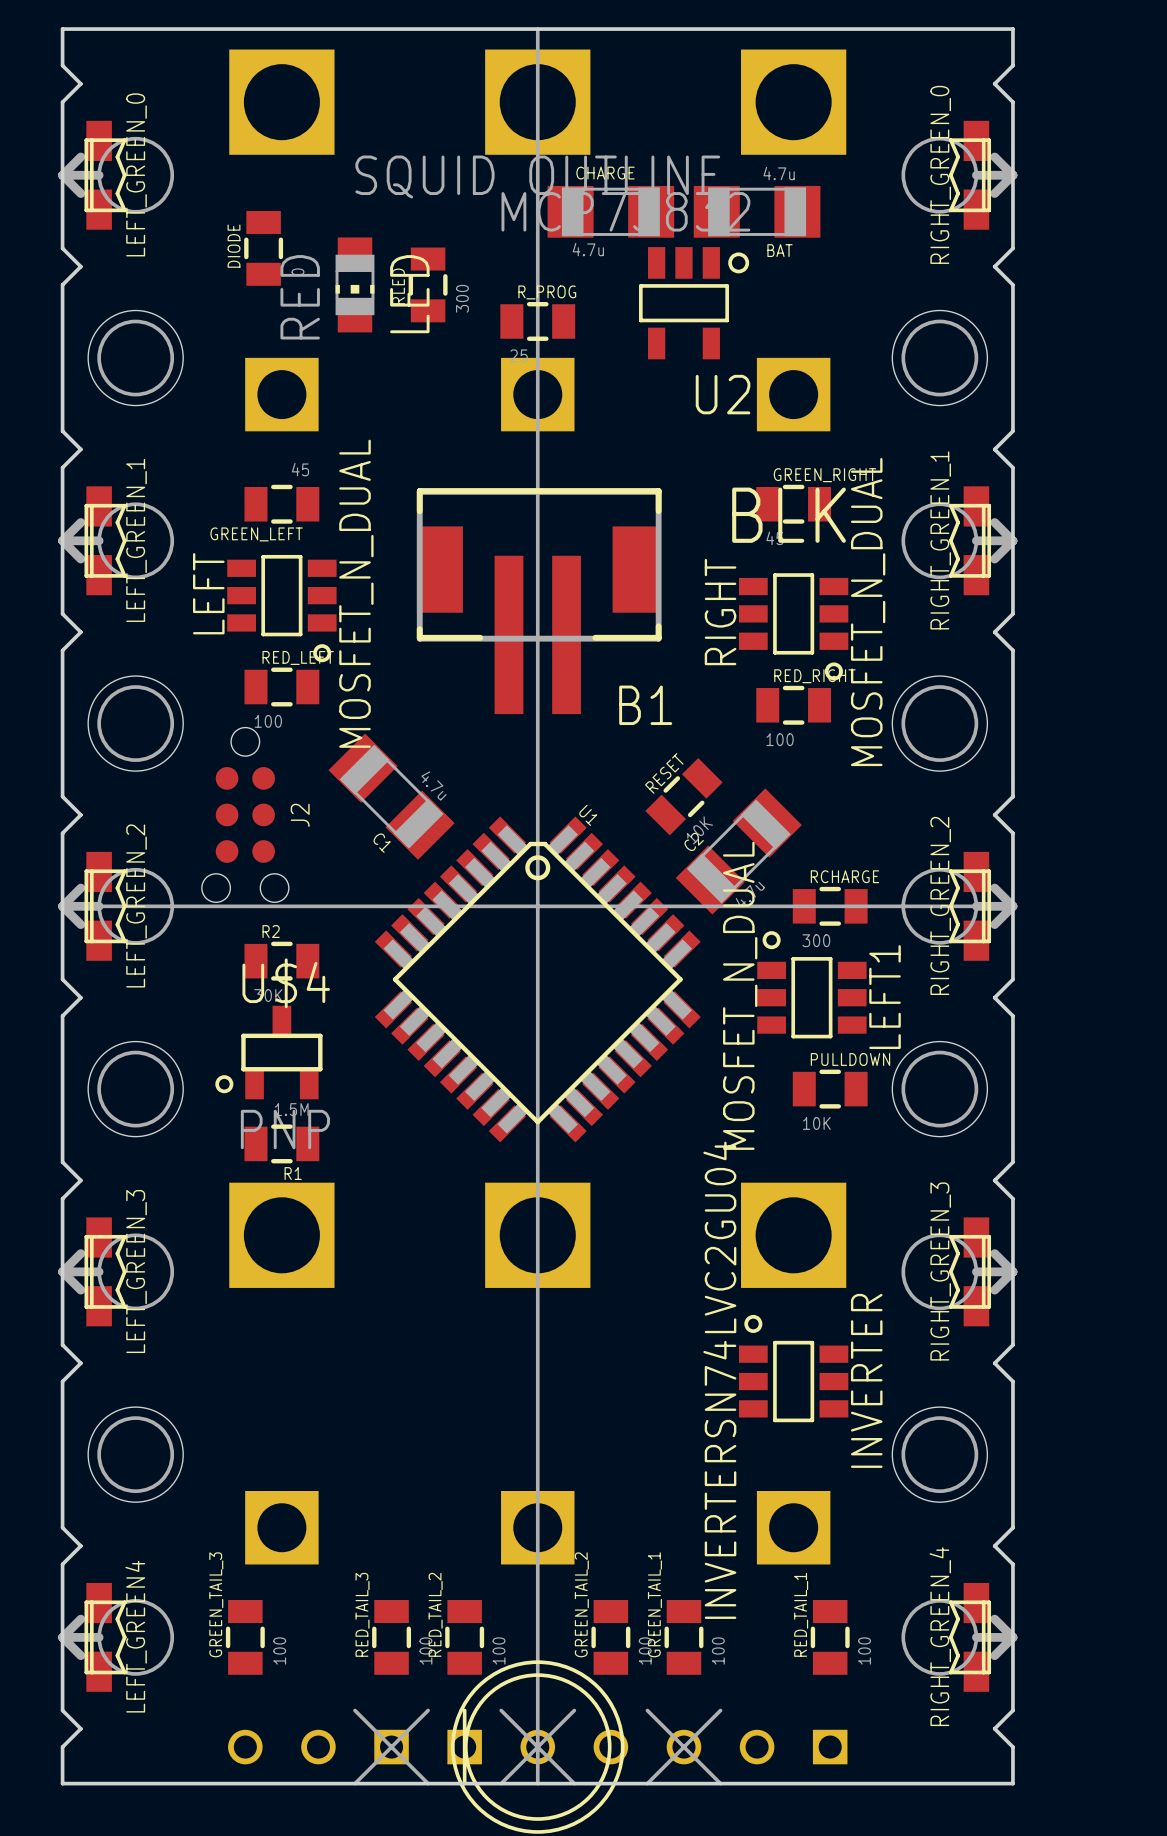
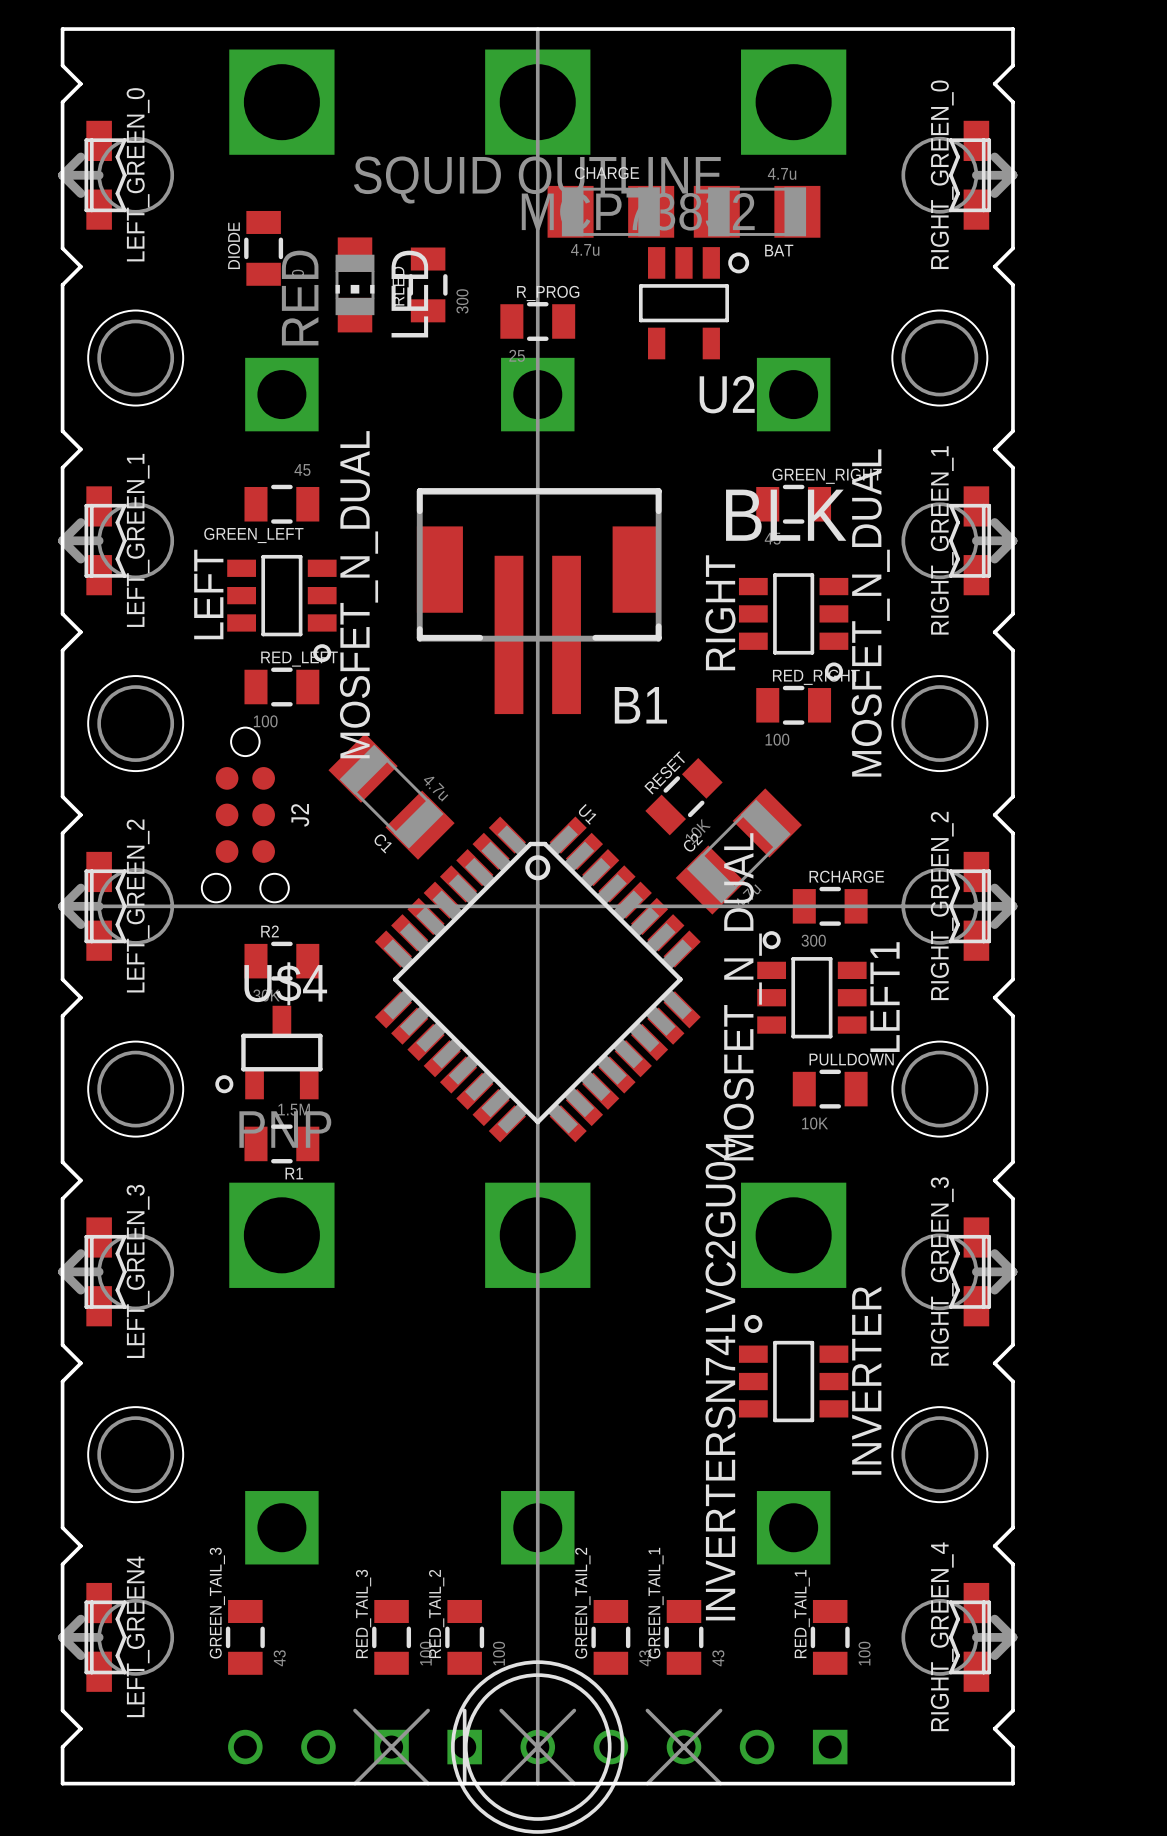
GREEN_TAIL_3 value: 100 (279, 1650) -> 43 (279, 1658)
GREEN_TAIL_2 value: 100 (645, 1650) -> 43 (645, 1658)
GREEN_TAIL_1 value: 100 (718, 1650) -> 43 (718, 1658)

